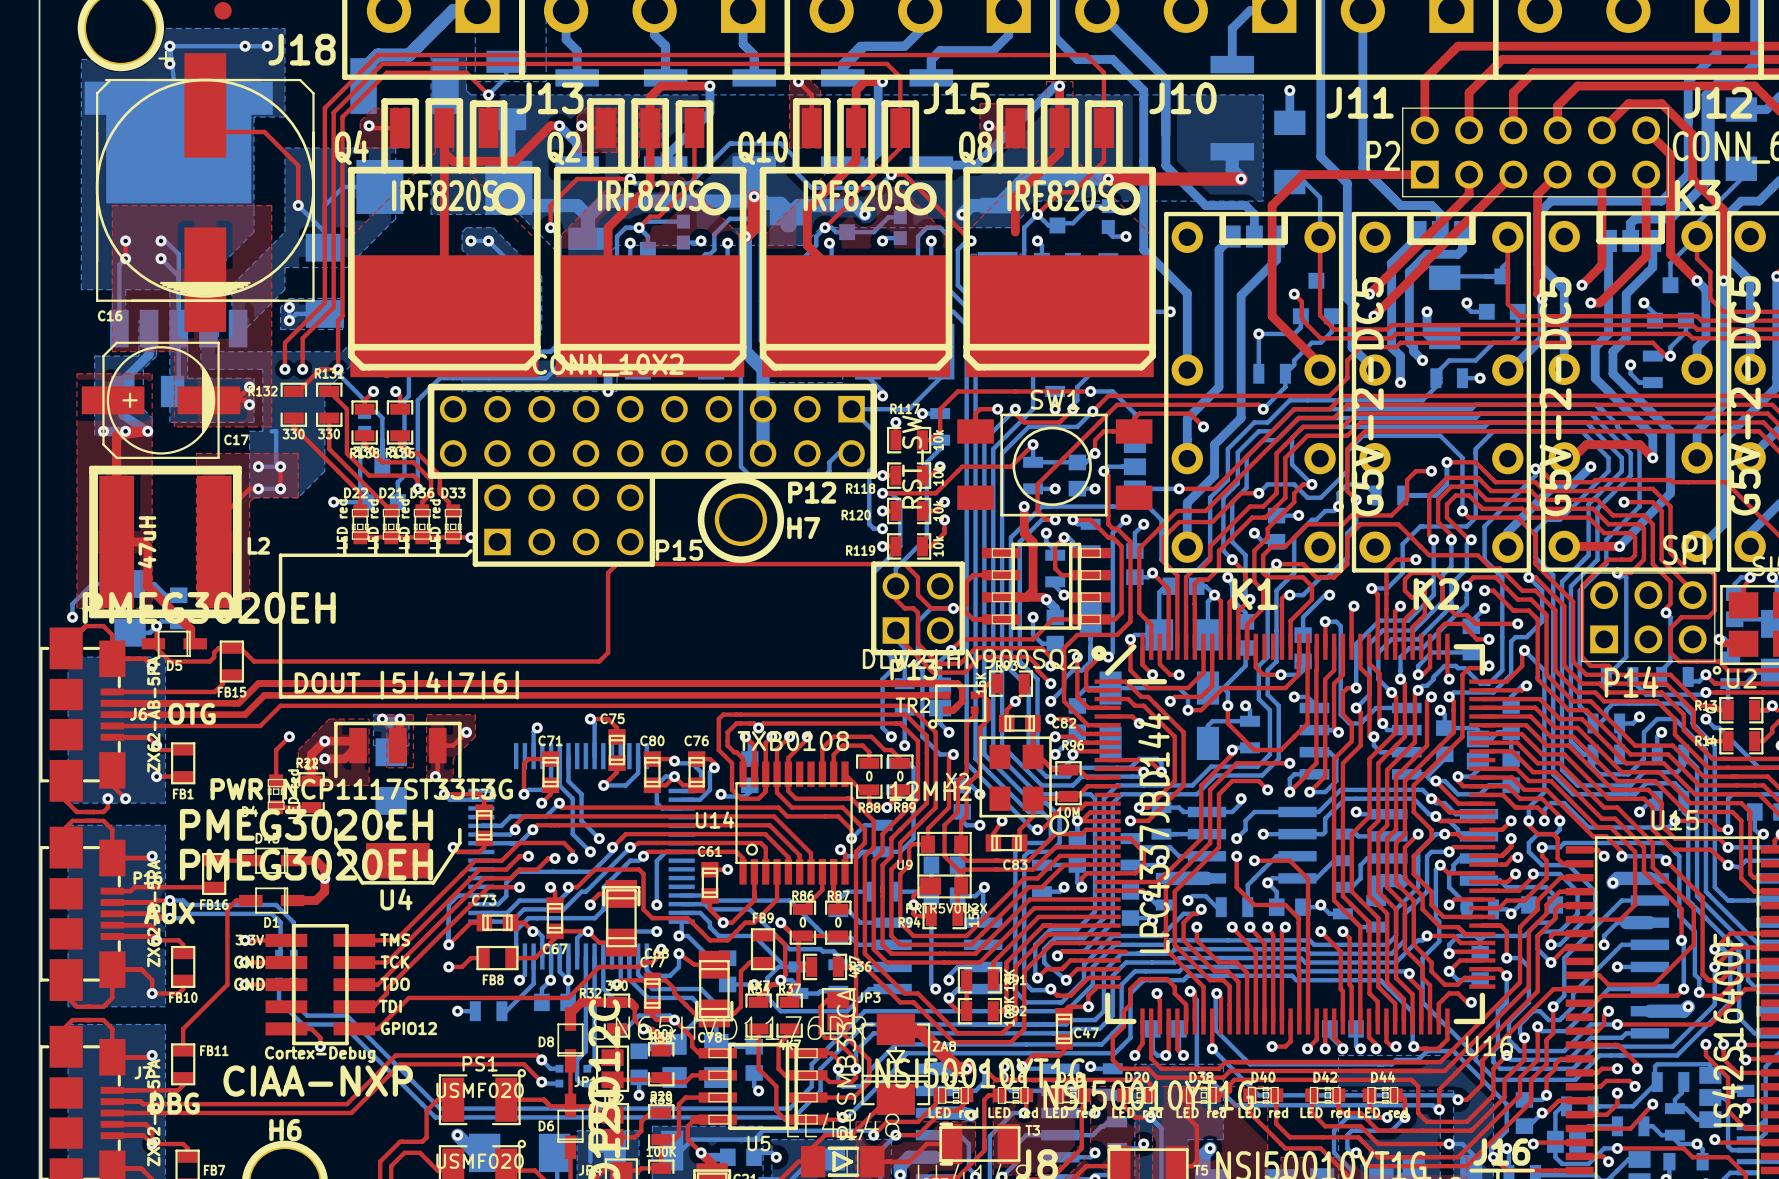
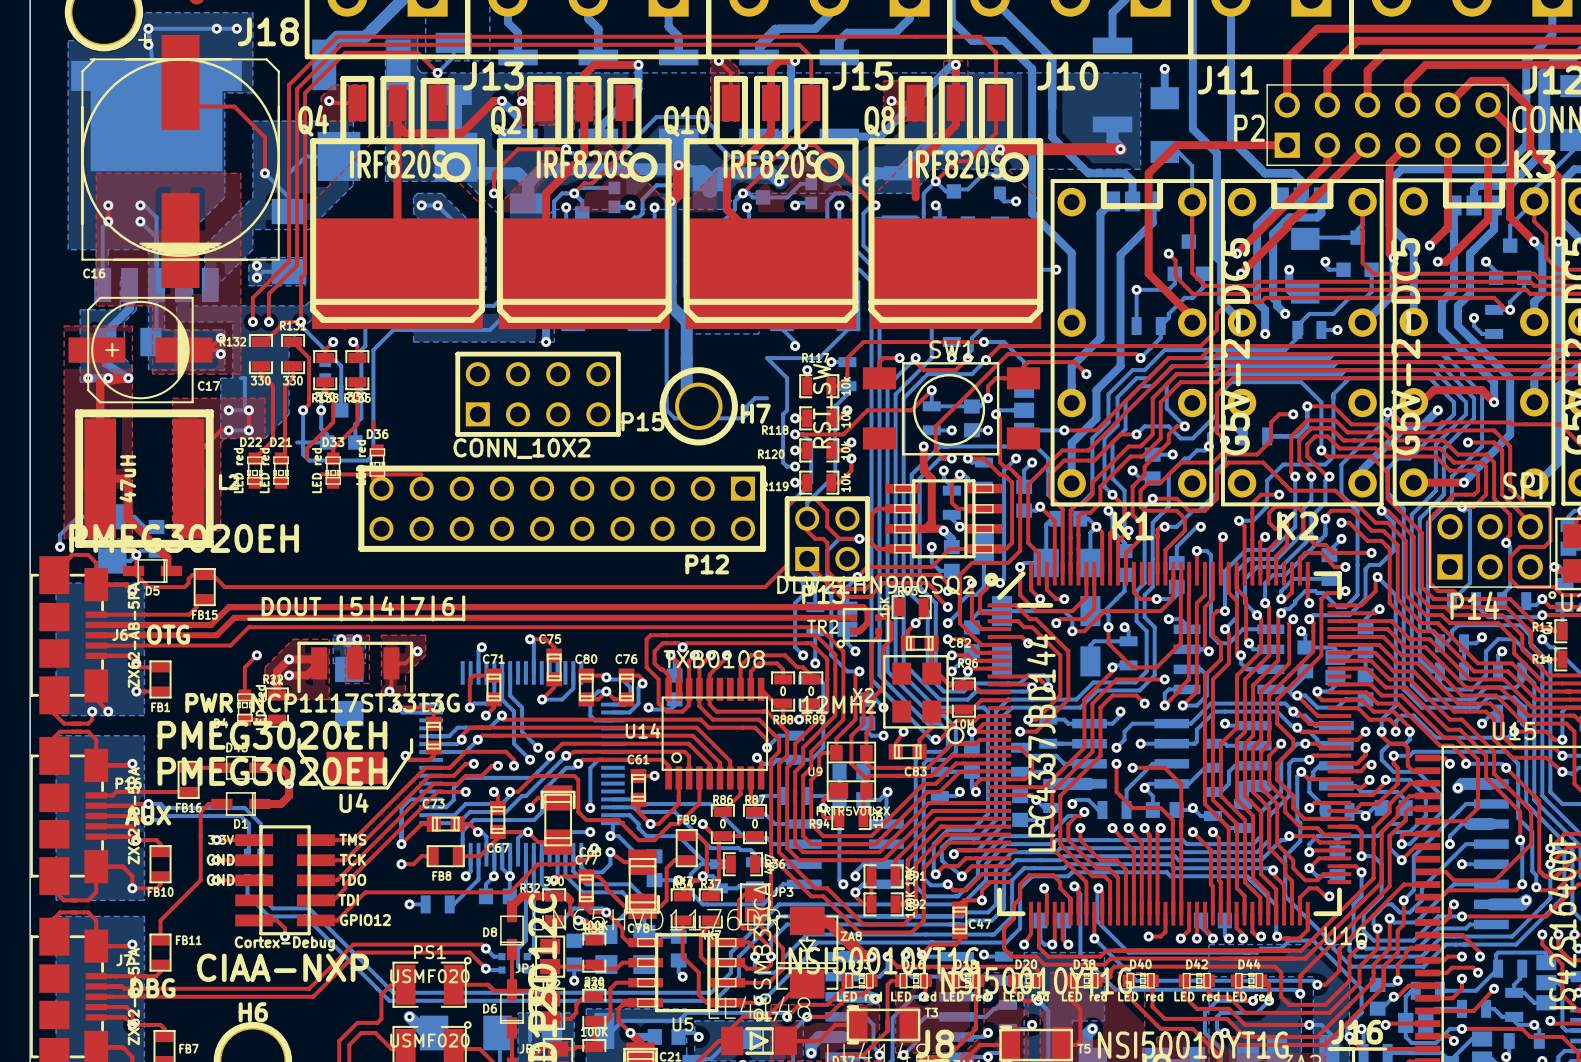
top track: (329, 431) (329, 449) (391, 511) -> (293, 378) (285, 386) (285, 458)
P12 position: (652, 431) -> (562, 508)
top track: (307, 440) (360, 493) (360, 511) -> (272, 386) (272, 440) (258, 454) (258, 458)
top track: (400, 444) (408, 453) (417, 453) (439, 475) (439, 493) (448, 502) (448, 506) (453, 511) -> (357, 390) (357, 424) (333, 448) (333, 458)
top track: (346, 453) (369, 475) (413, 475) (417, 480) -> (309, 398) (309, 404) (303, 410)
top track: (373, 453) (382, 462) (413, 462) (431, 480) (431, 493) (422, 502) (422, 511) -> (333, 398) (333, 422) (307, 448) (307, 458)
bottom track: none -> (303, 410) (303, 454) (309, 460) (367, 460) (373, 454) (373, 430)
via: none -> (303, 410)
via: none -> (321, 410)
via: (417, 488) -> none
via: (333, 502) -> none
P15 position: (563, 519) -> (538, 394)
H7 position: (740, 519) -> (698, 406)
D22 position: (360, 524) -> (254, 470)
D21 position: (391, 524) -> (281, 470)
D33 position: (453, 524) -> (333, 470)
line: (406, 535) (406, 555) -> none
line: (437, 535) (437, 555) -> none
line: (344, 537) (344, 555) -> none
line: (375, 537) (375, 555) -> none
via: (470, 537) -> none
line: (470, 550) (466, 555) (280, 555) (280, 696) -> none
top track: (882, 564) (616, 564) (608, 572) (608, 652) (599, 661) -> (795, 498) (787, 506) (787, 564) (765, 587) (538, 587)

